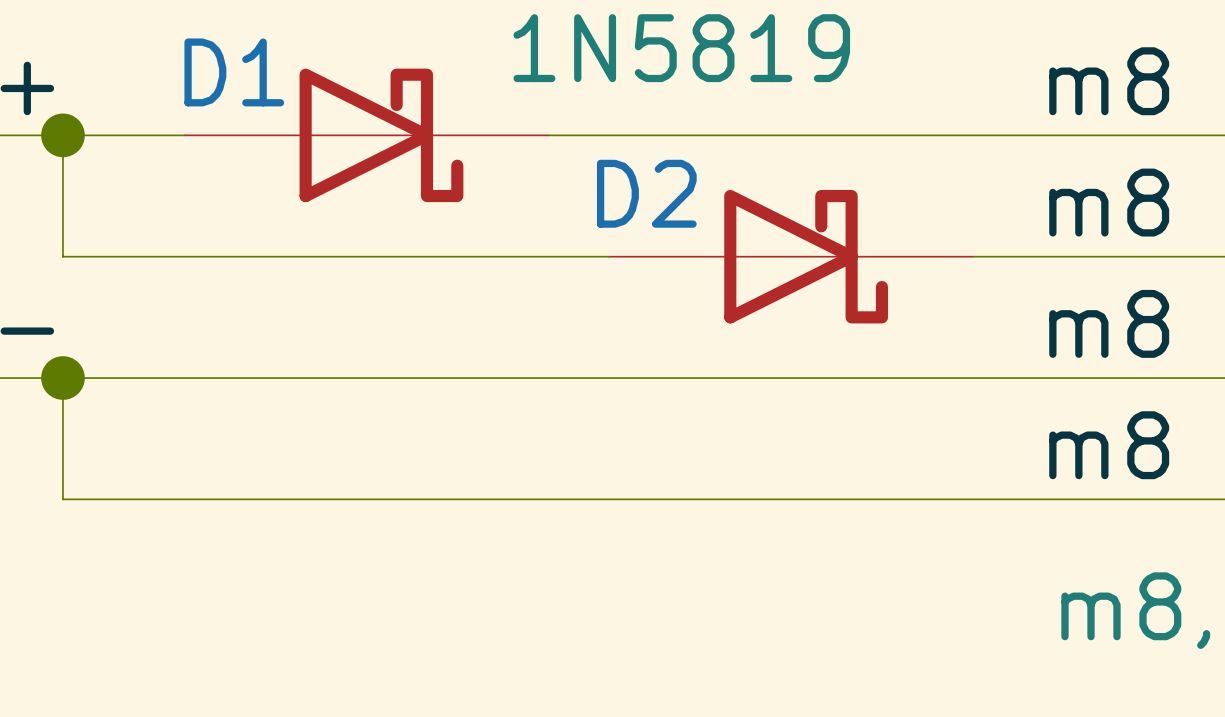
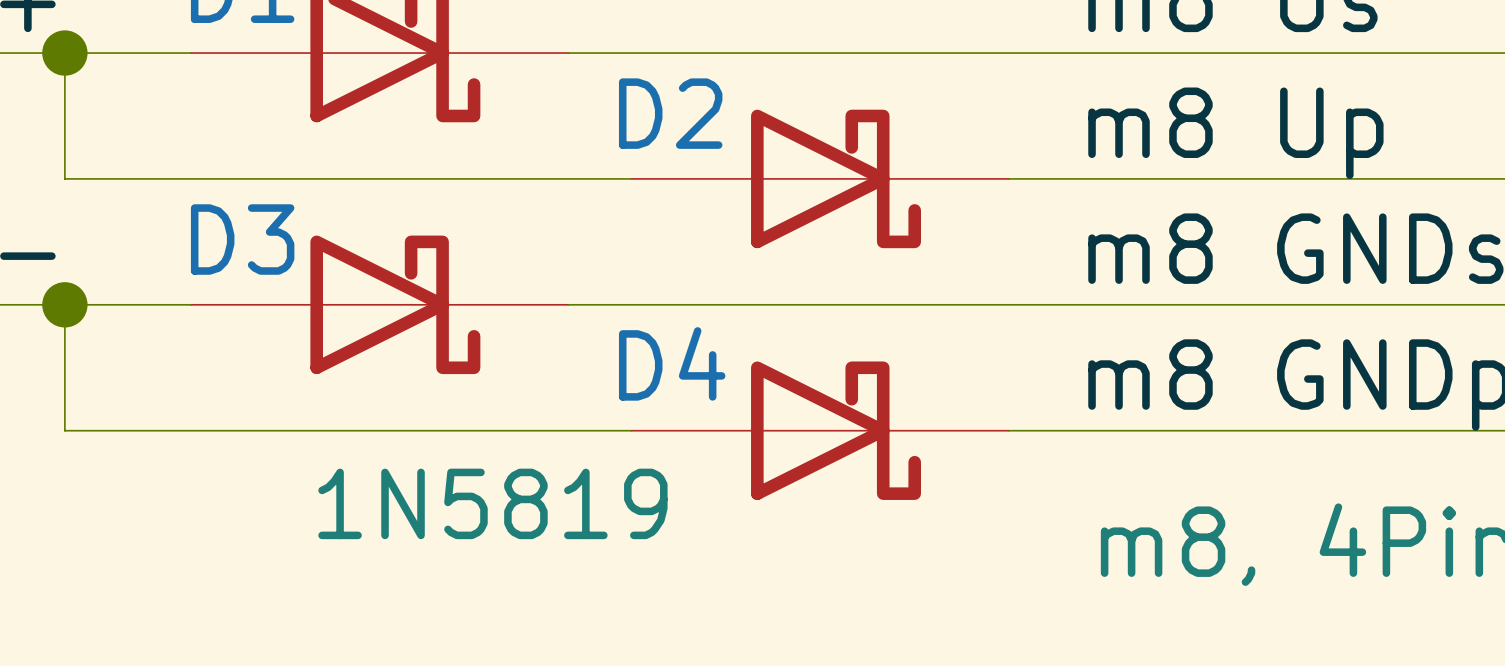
D3: none -> 1N5819 (379, 304)
D4: none -> (820, 430)

